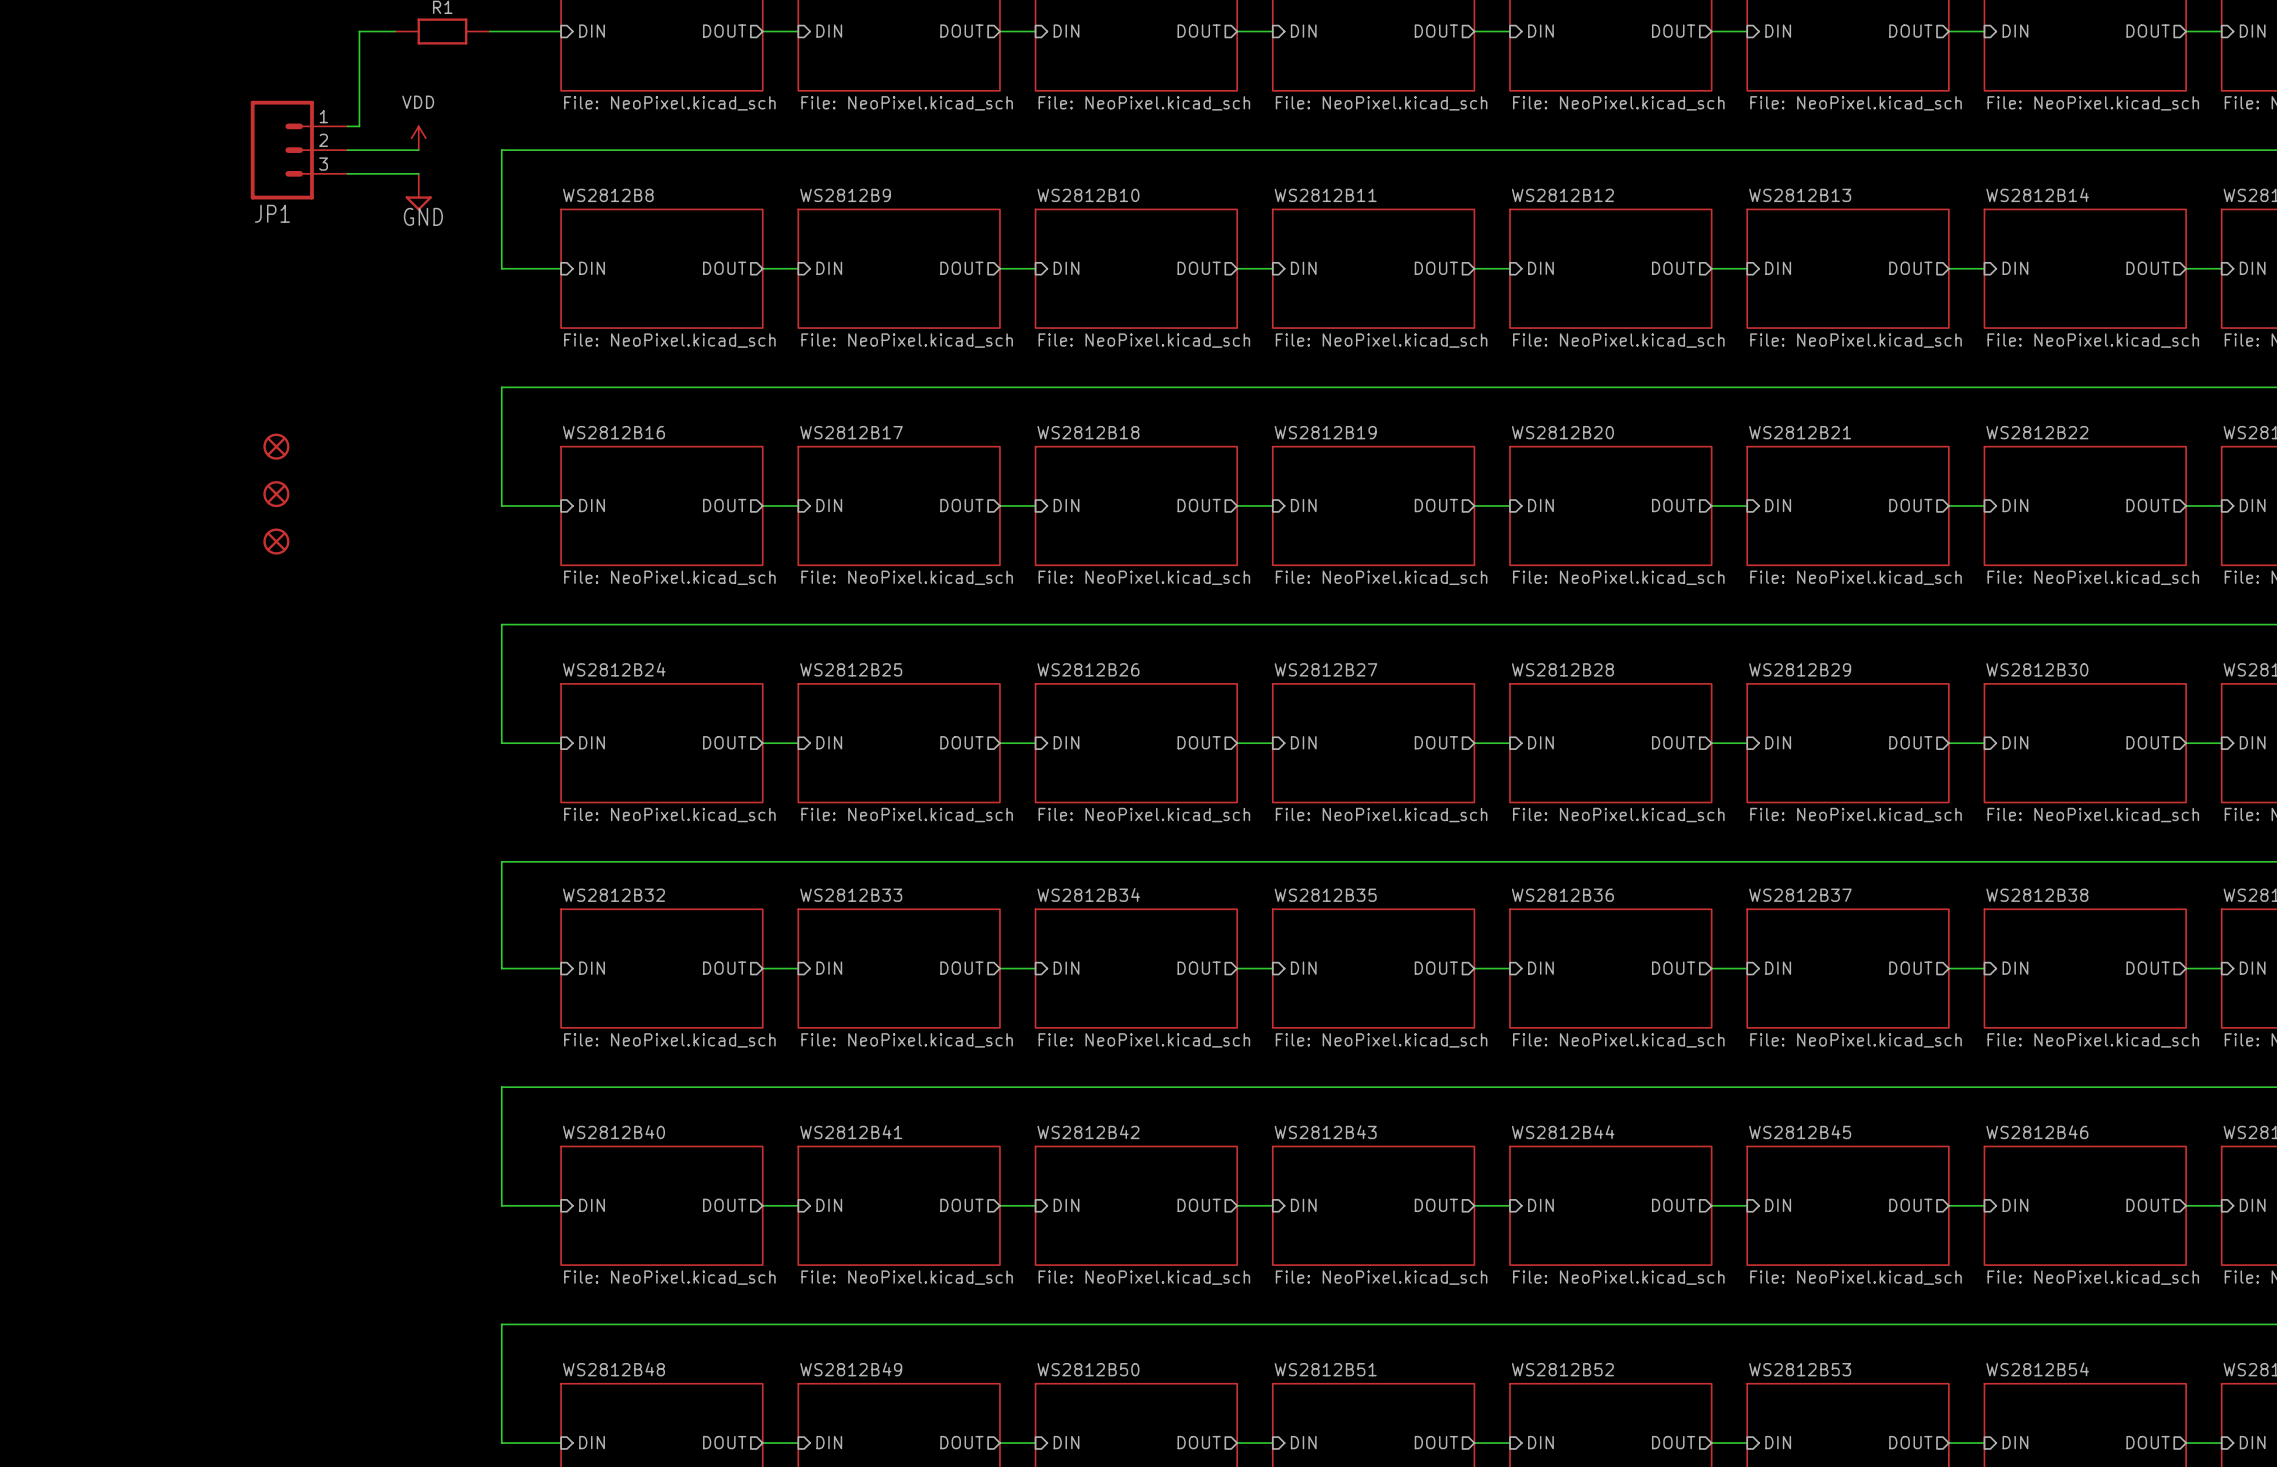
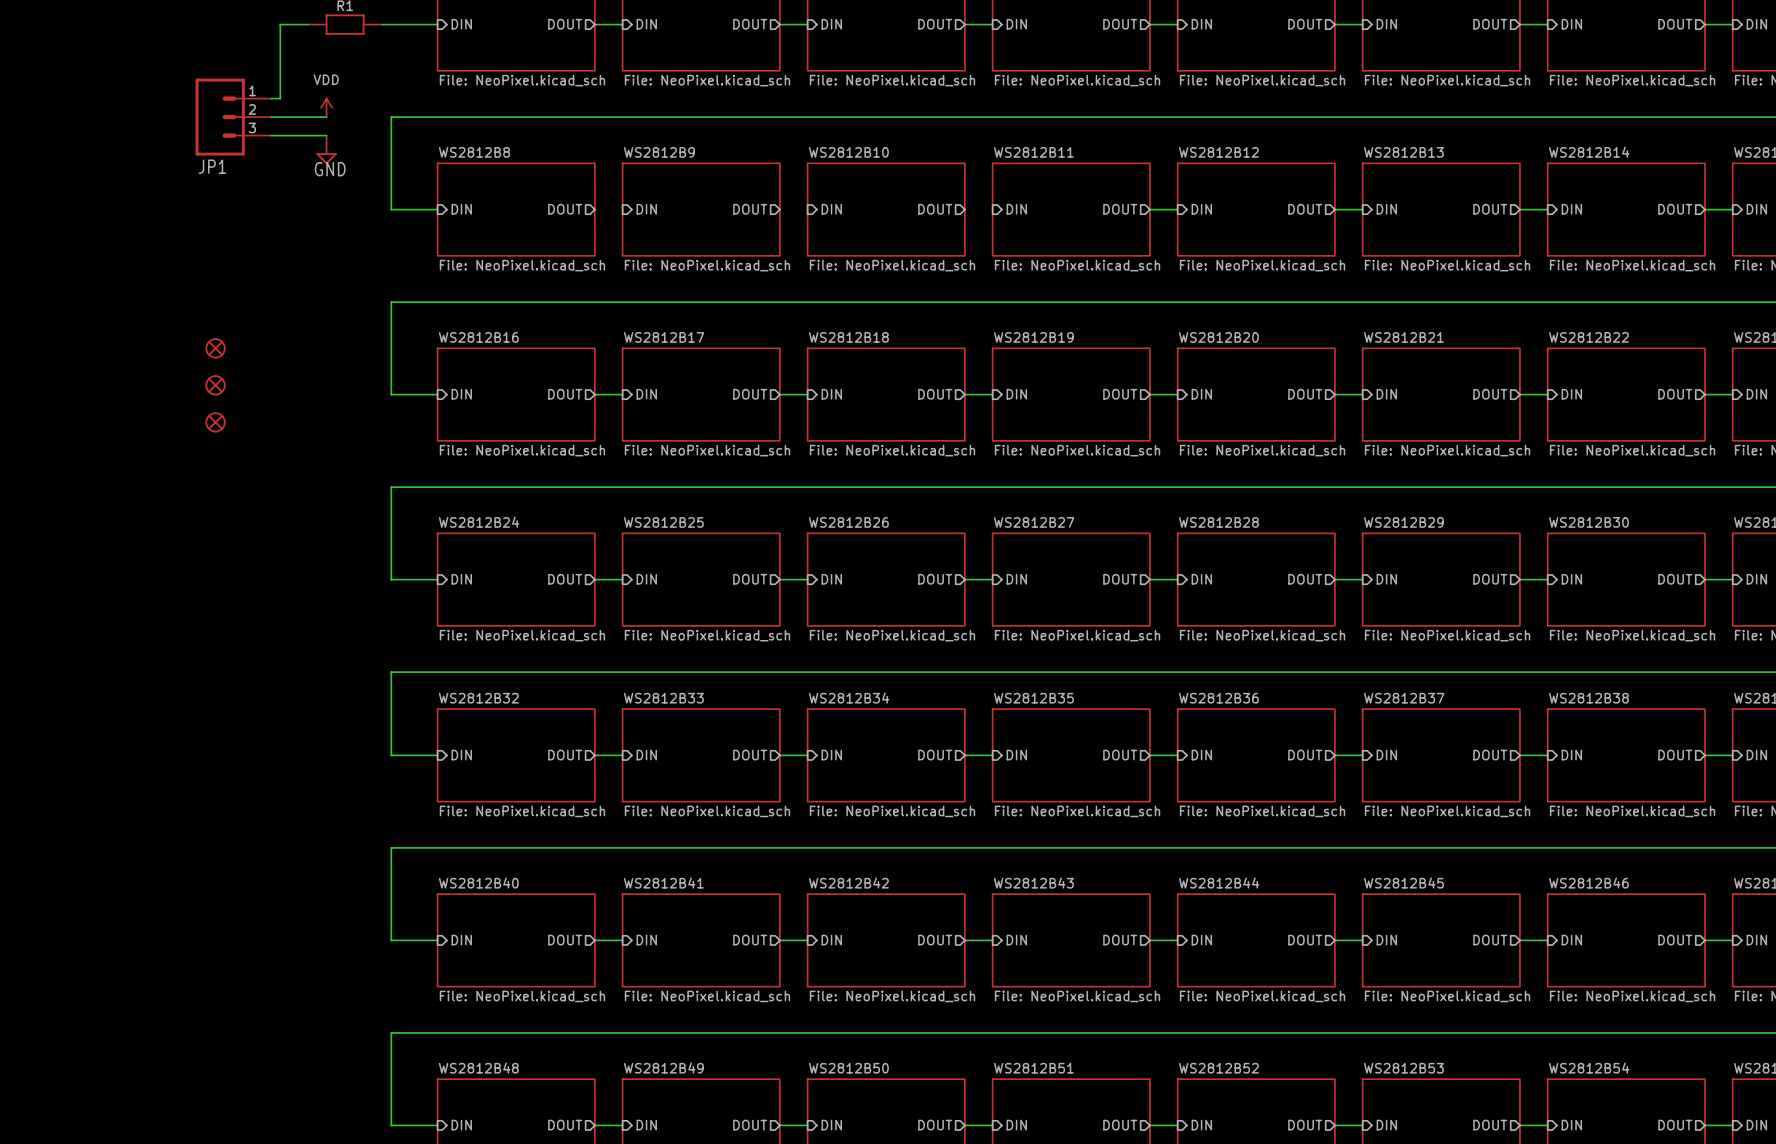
wire: (762, 268) (798, 268) -> none
wire: (999, 268) (1035, 268) -> none
wire: (1237, 268) (1272, 268) -> none

